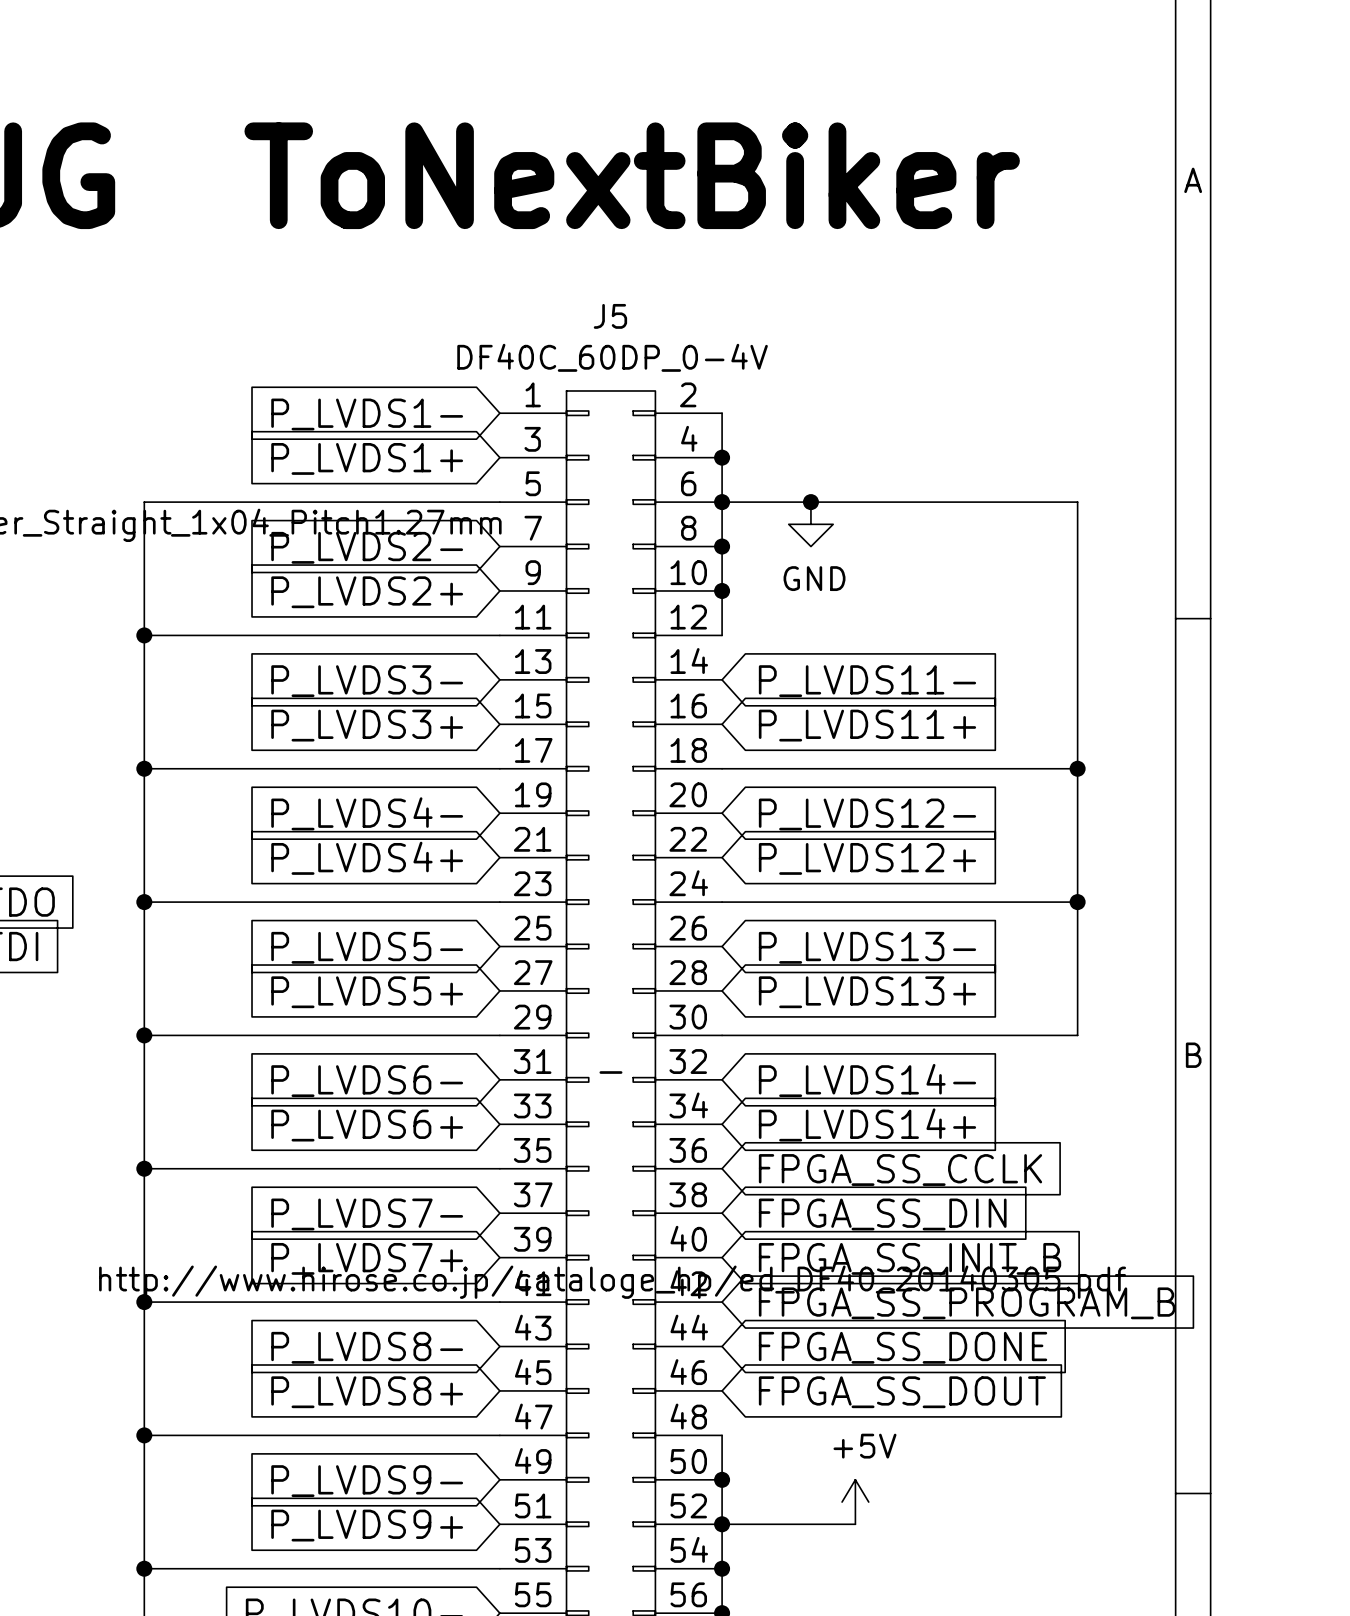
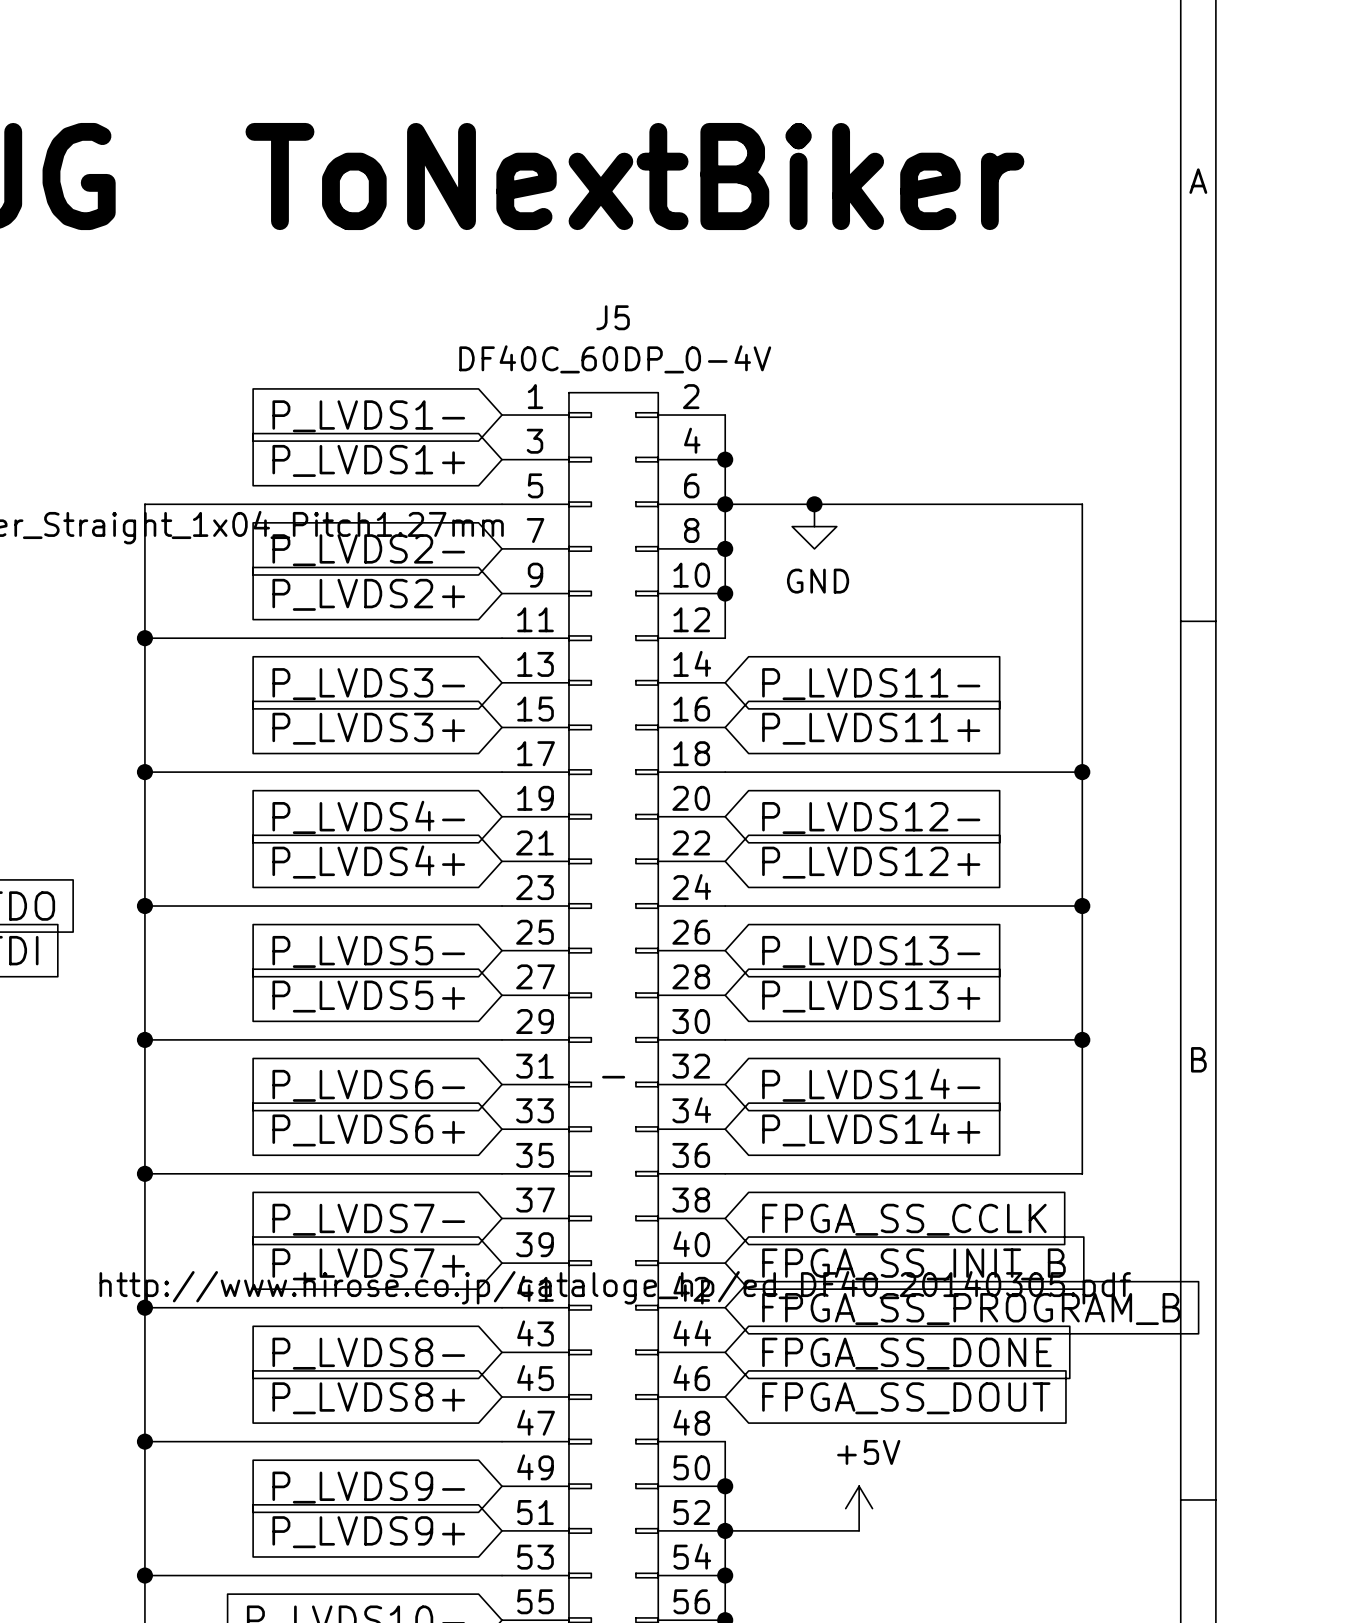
wire: none -> (1082, 1039) (1082, 1173) (725, 1173)
junction: none -> (1082, 1039)
global label: FPGA_SS_CCLK (900, 1170) -> none
global label: FPGA_SS_DIN (882, 1214) -> FPGA_SS_CCLK (904, 1219)

